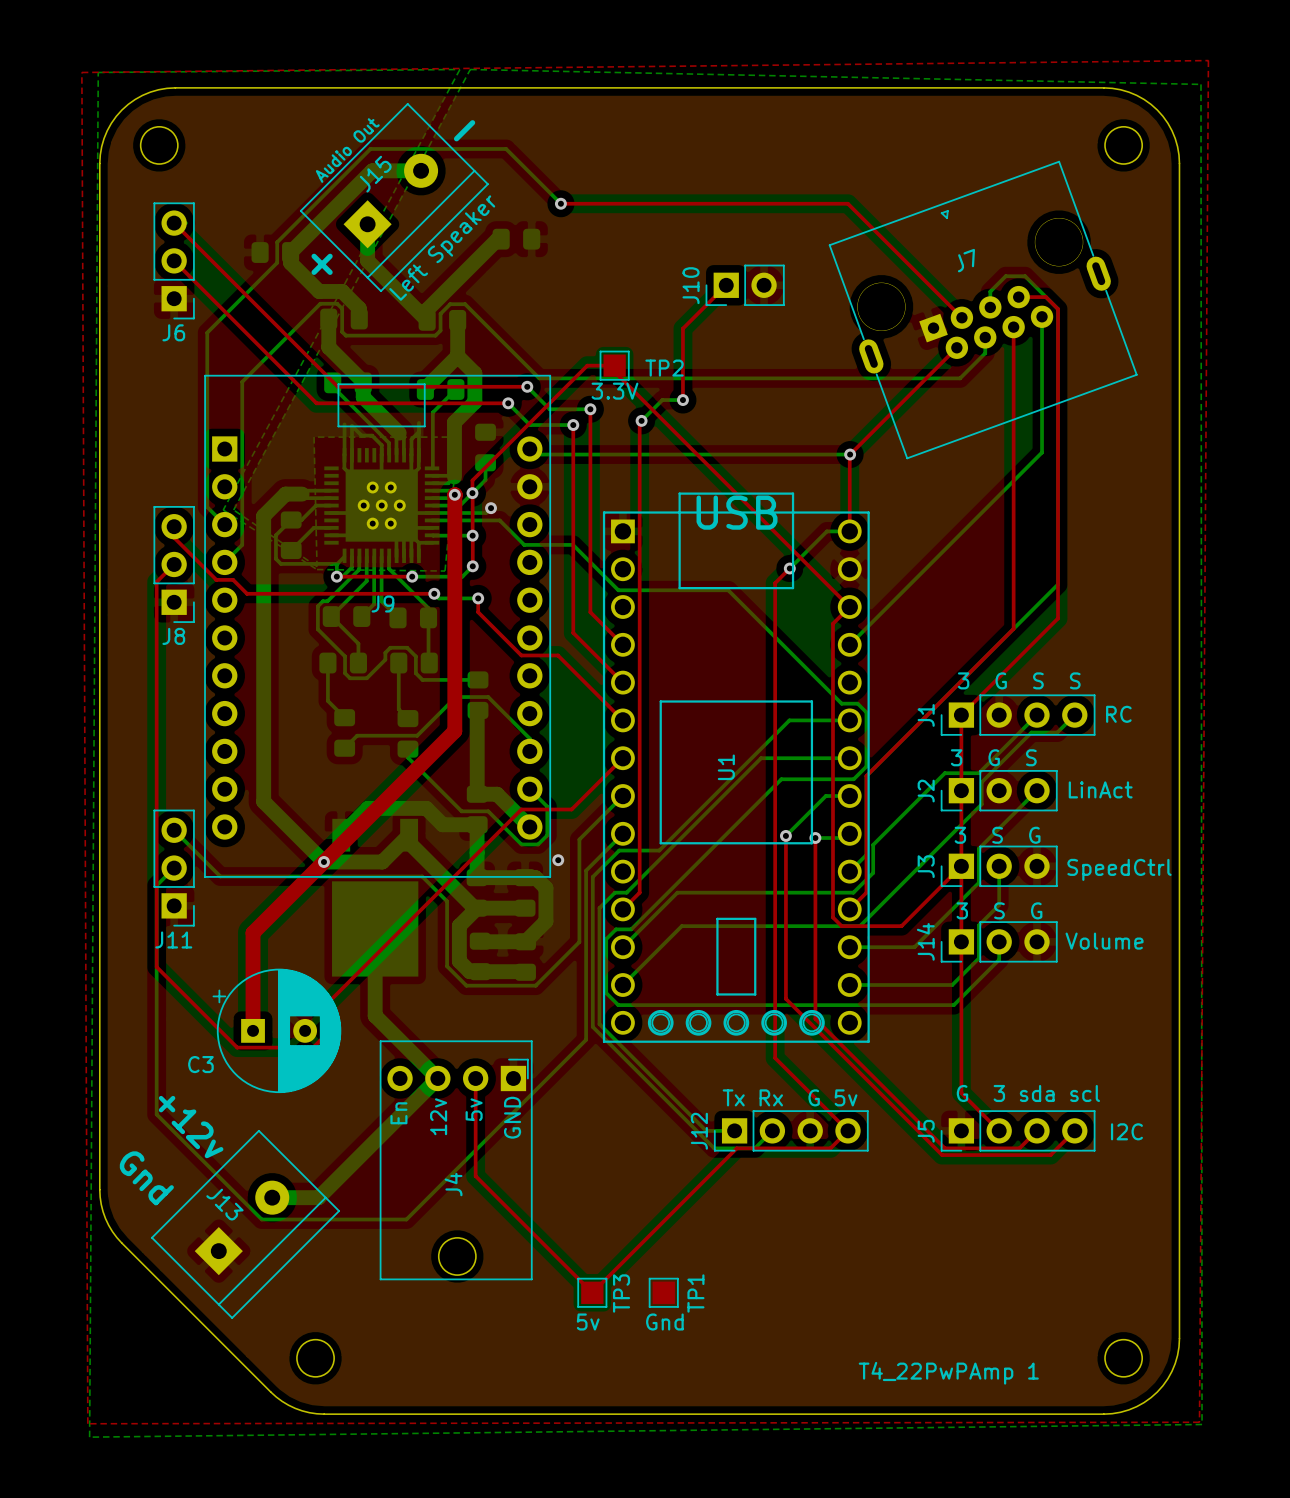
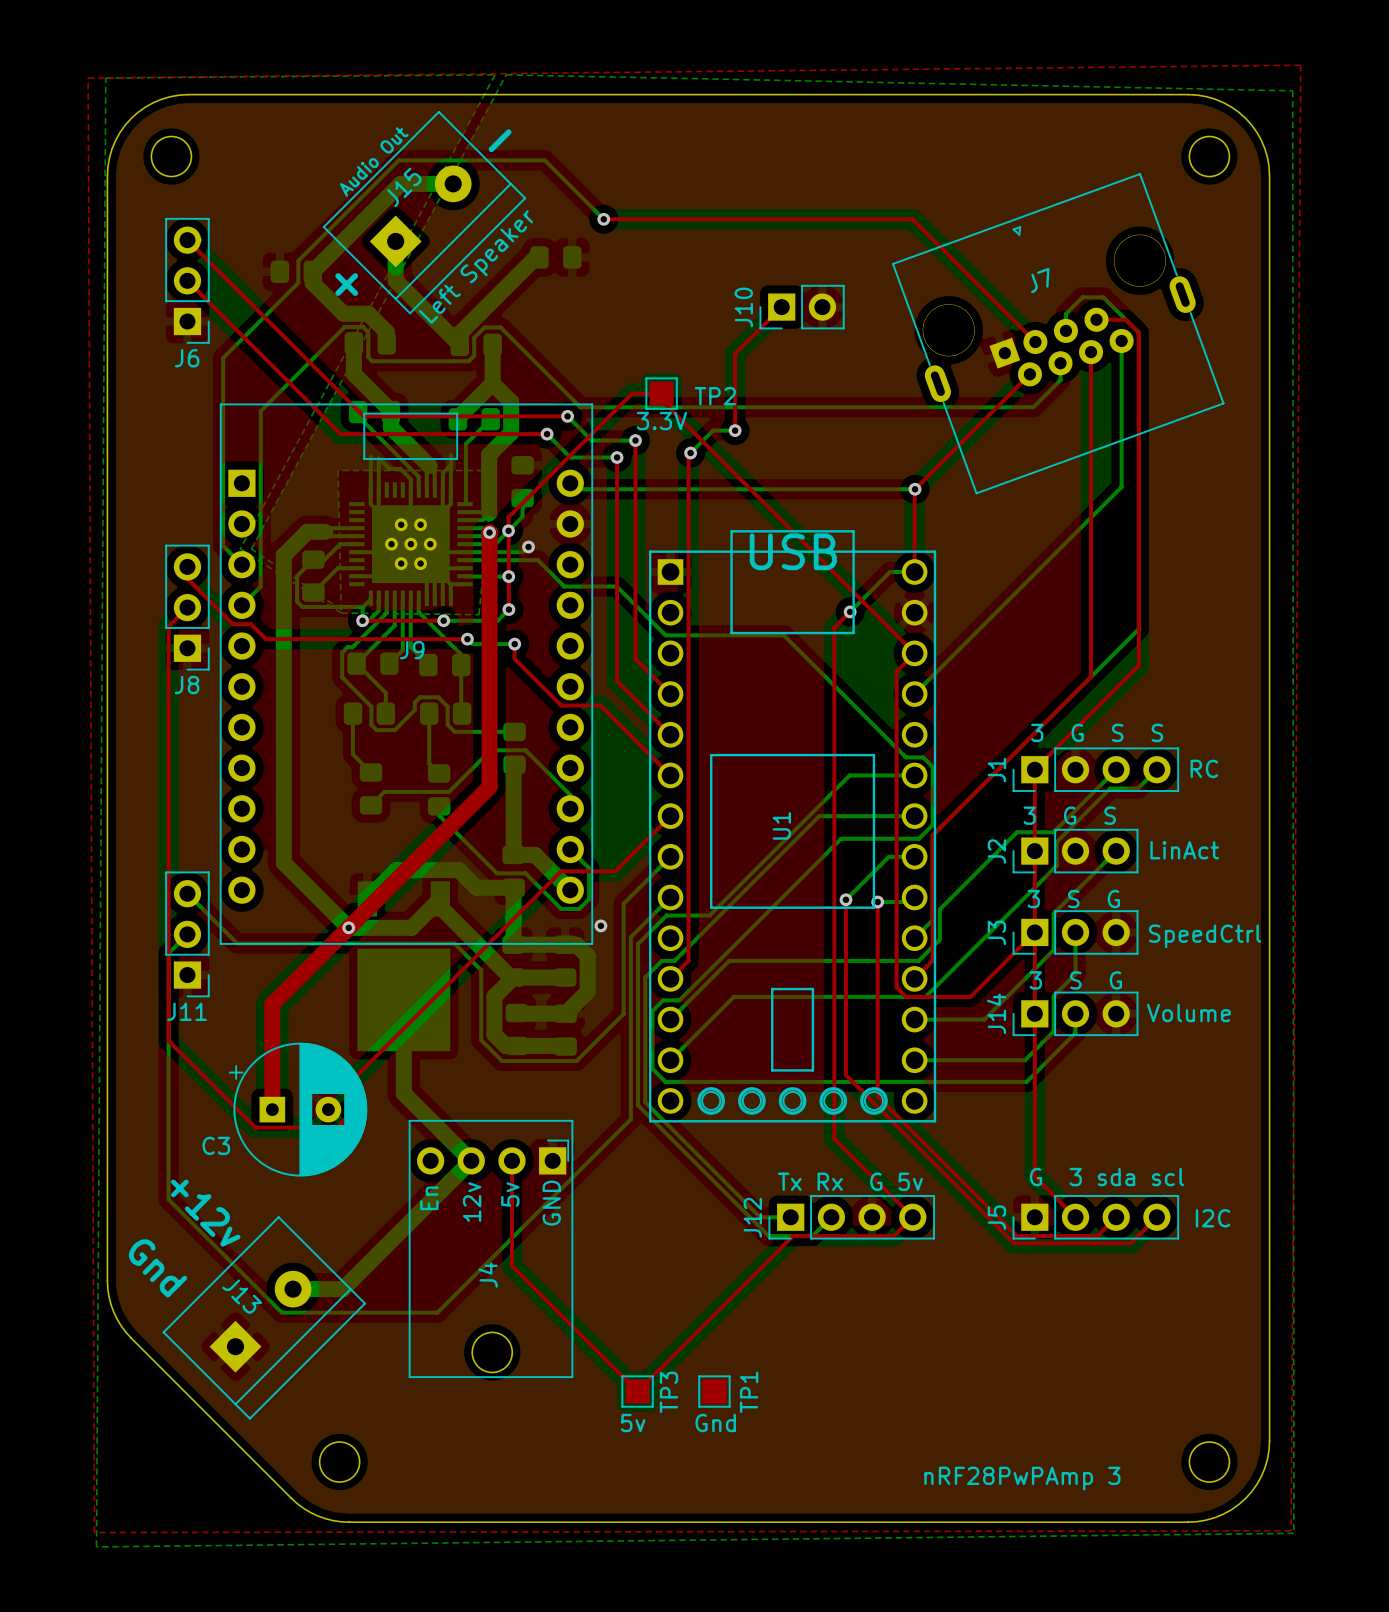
text: T4_22PwPAmp 1 (948, 1373) -> nRF28PwPAmp 3 (1022, 1478)

